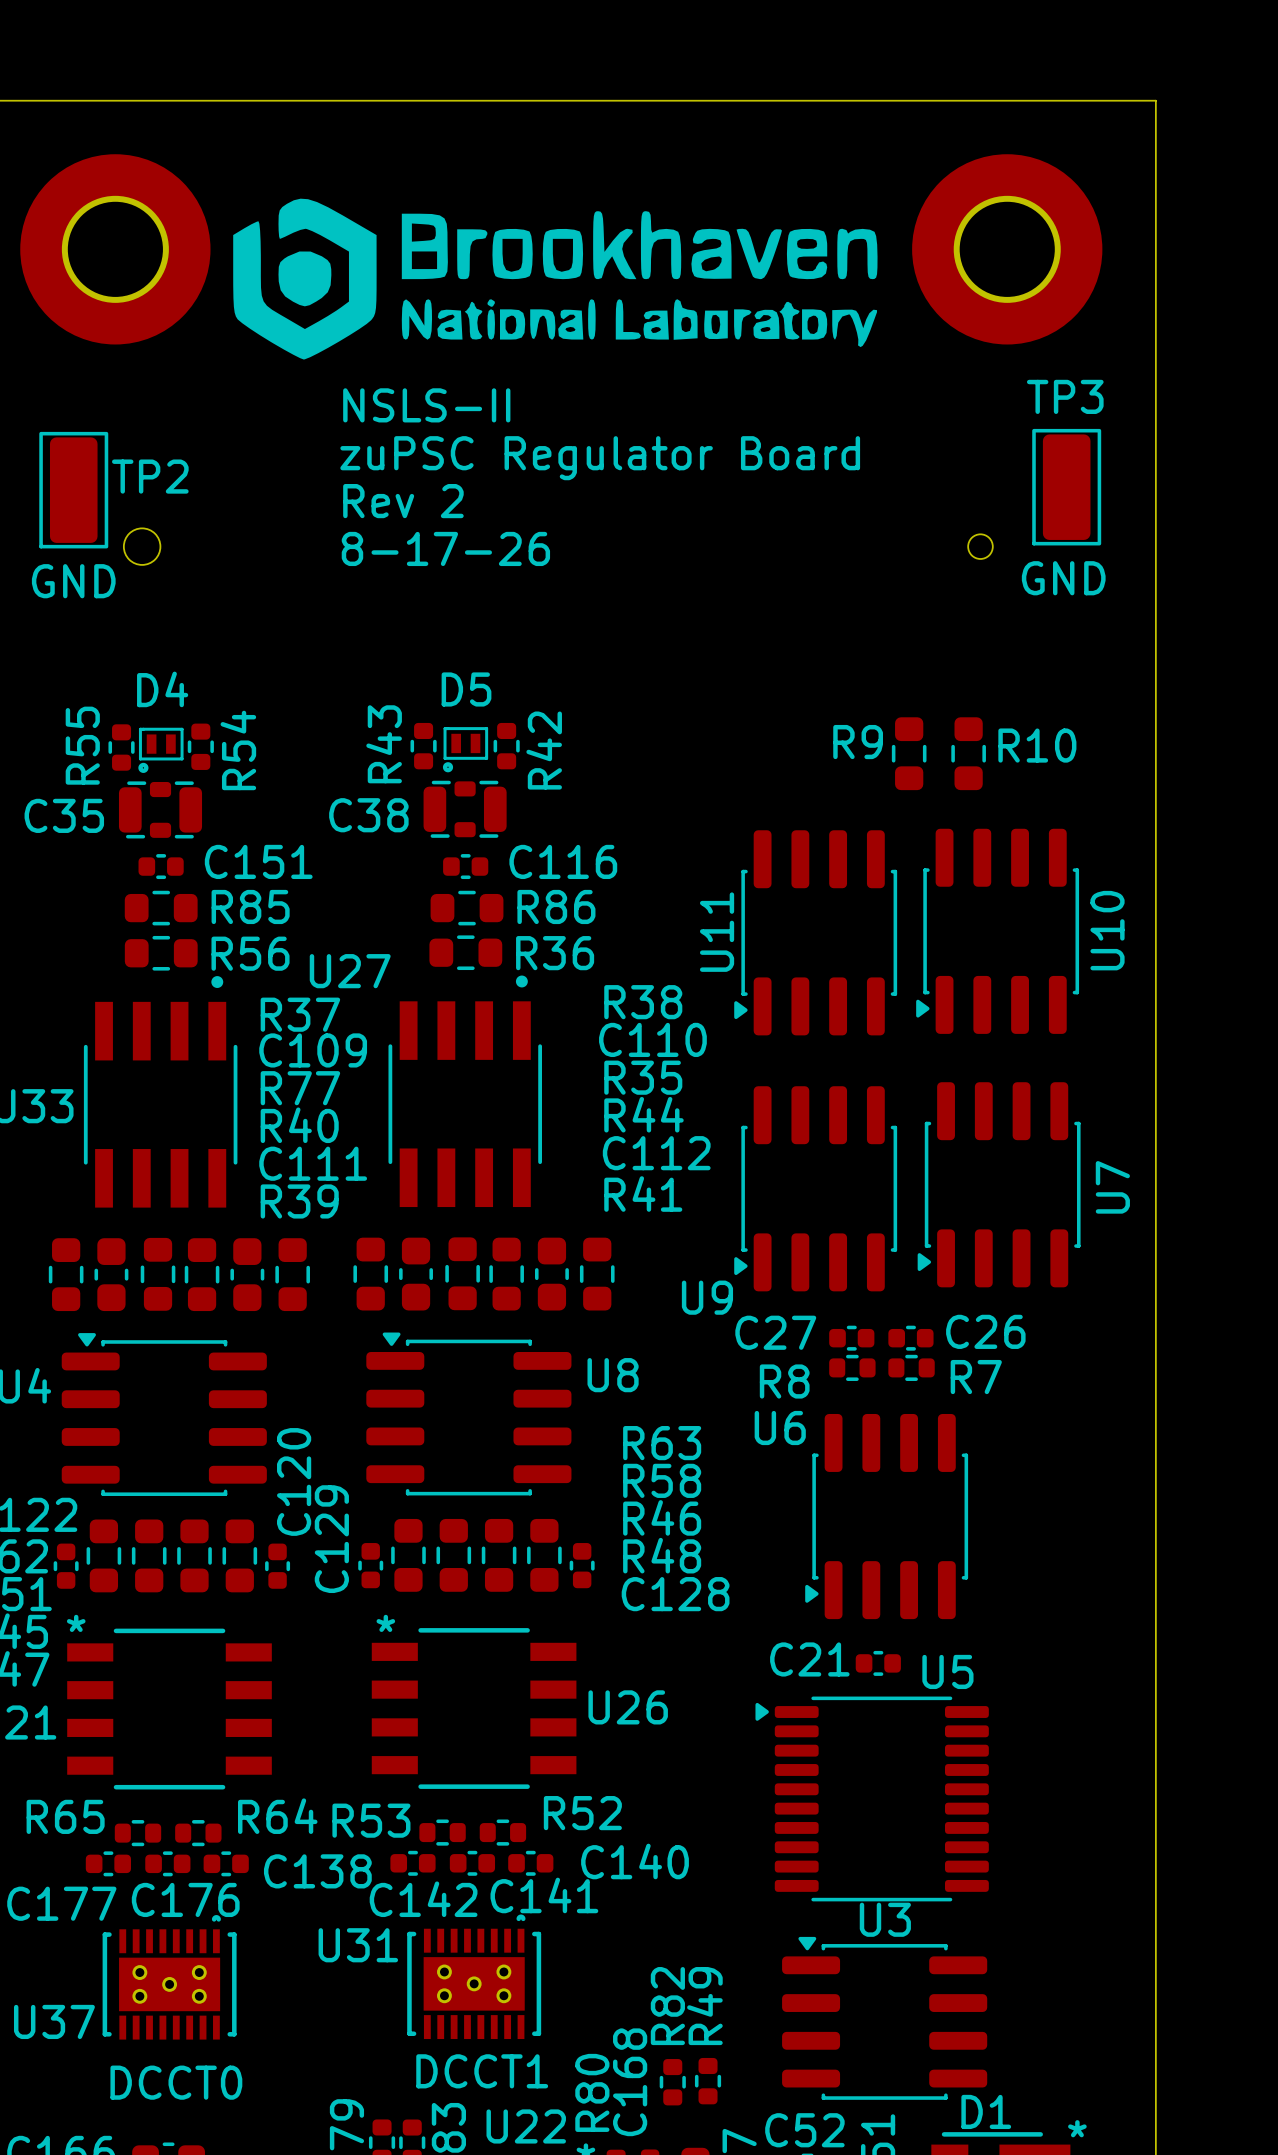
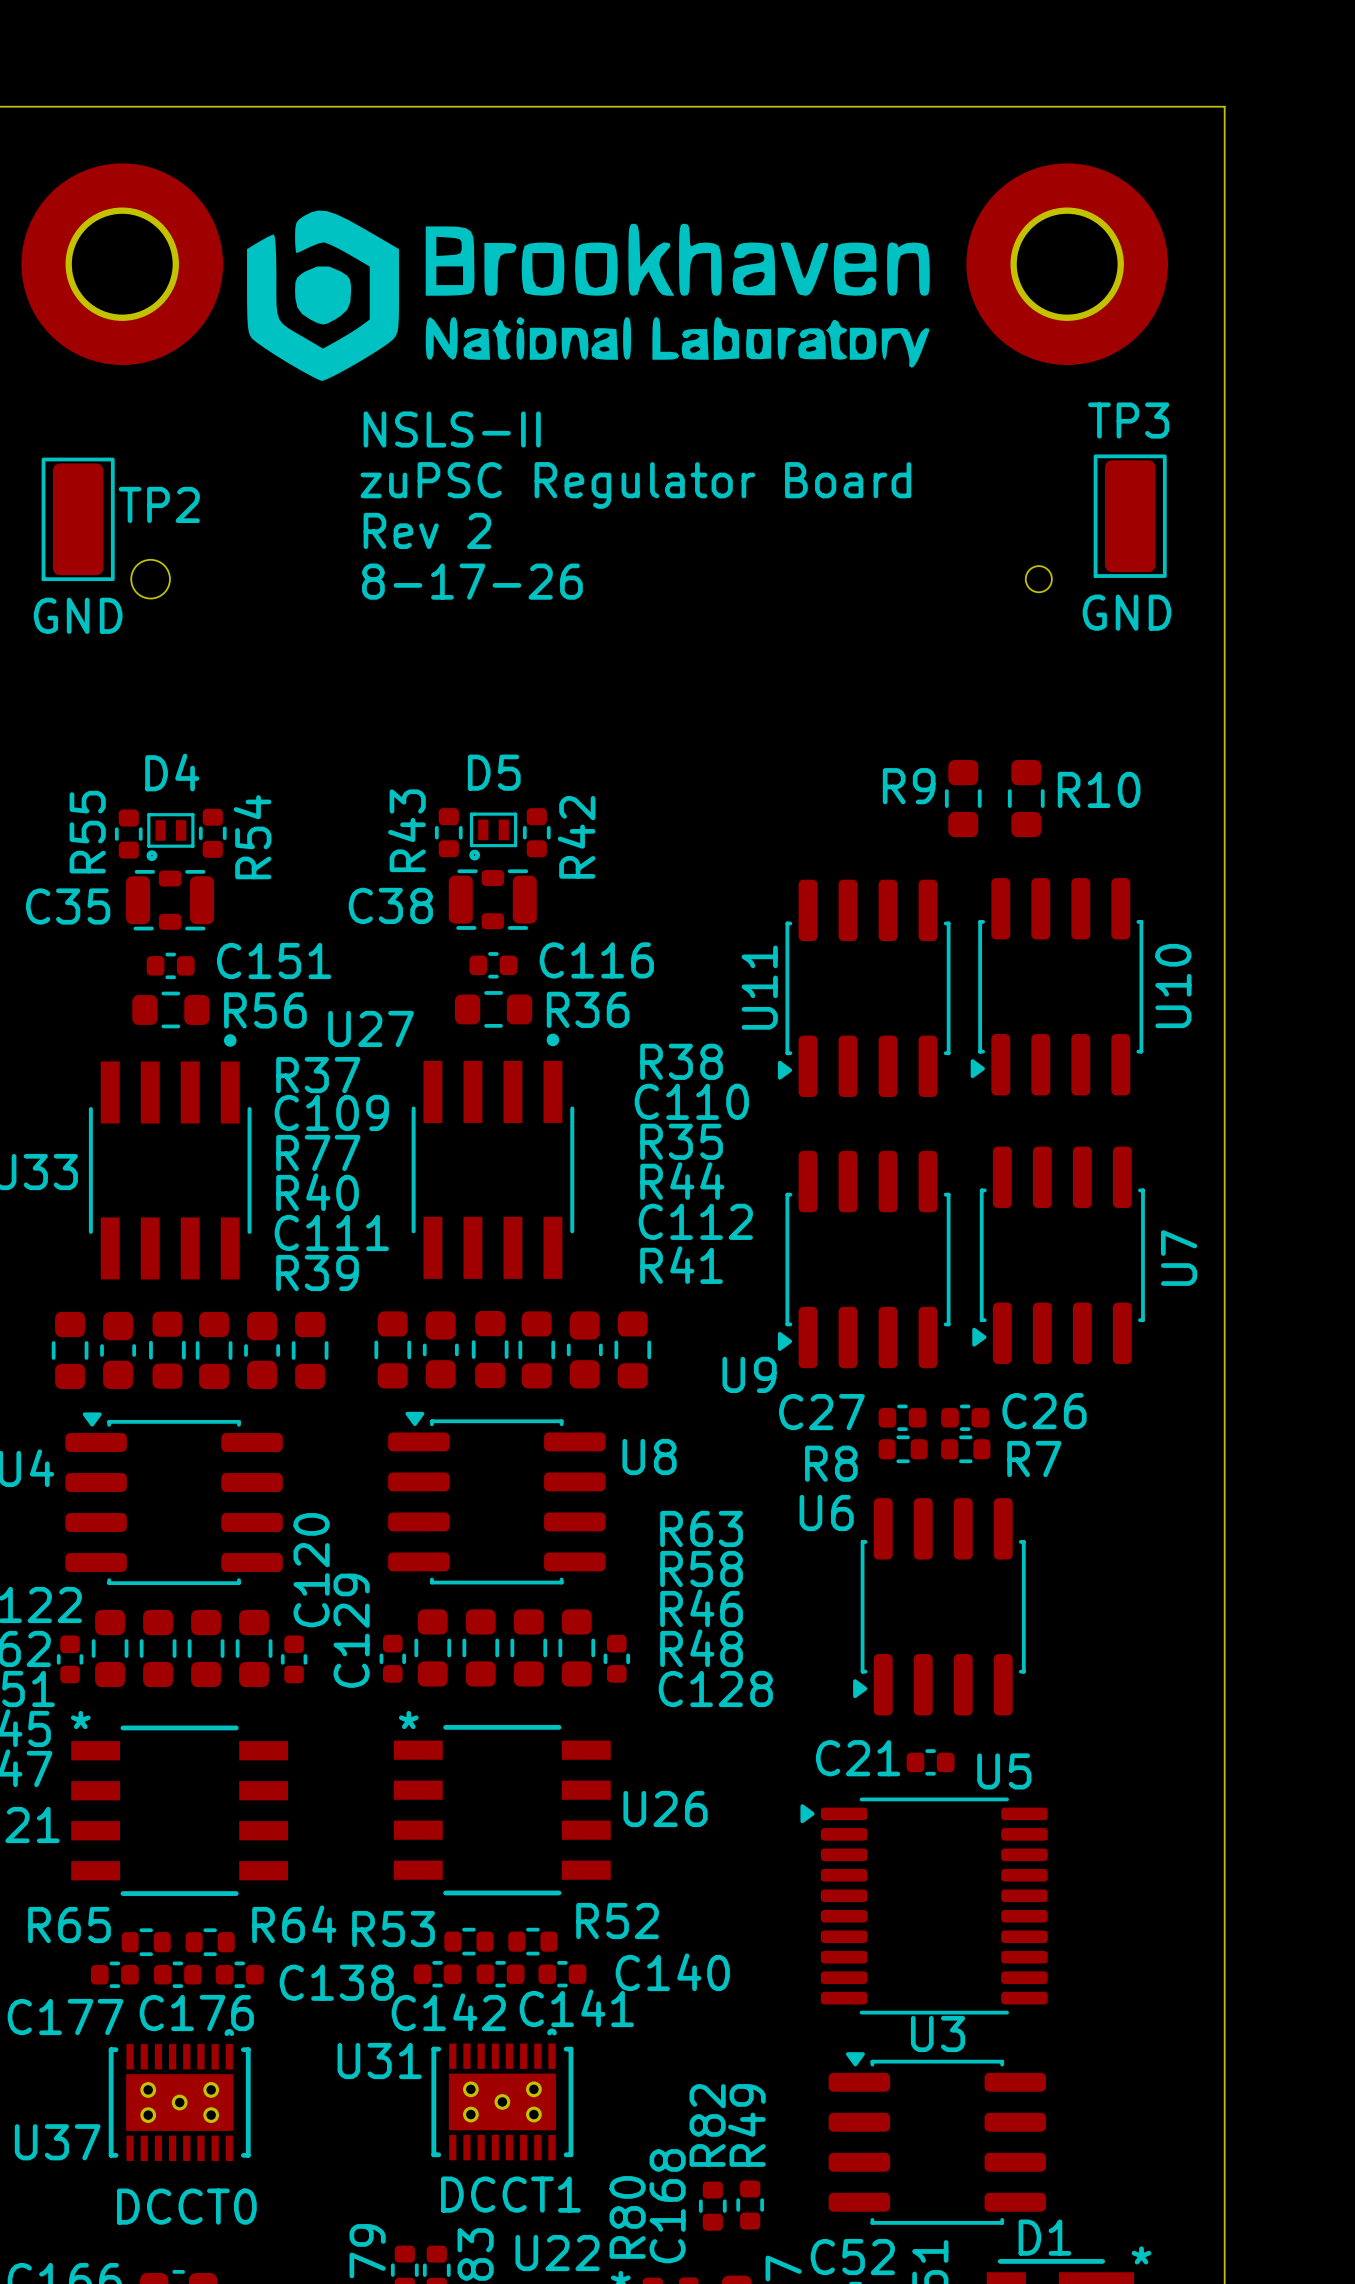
R54 position: (200, 746) -> (212, 833)
R43 position: (423, 746) -> (448, 832)
R42 position: (506, 746) -> (536, 832)
R55 position: (121, 747) -> (128, 834)
D5 position: (465, 749) -> (493, 836)
D4 position: (160, 750) -> (170, 837)
C35 position: (160, 809) -> (170, 900)
C38 position: (465, 809) -> (492, 899)
C151 position: (161, 866) -> (170, 965)
C116 position: (465, 866) -> (493, 965)
R85: (161, 908) -> none
R86: (467, 908) -> none

